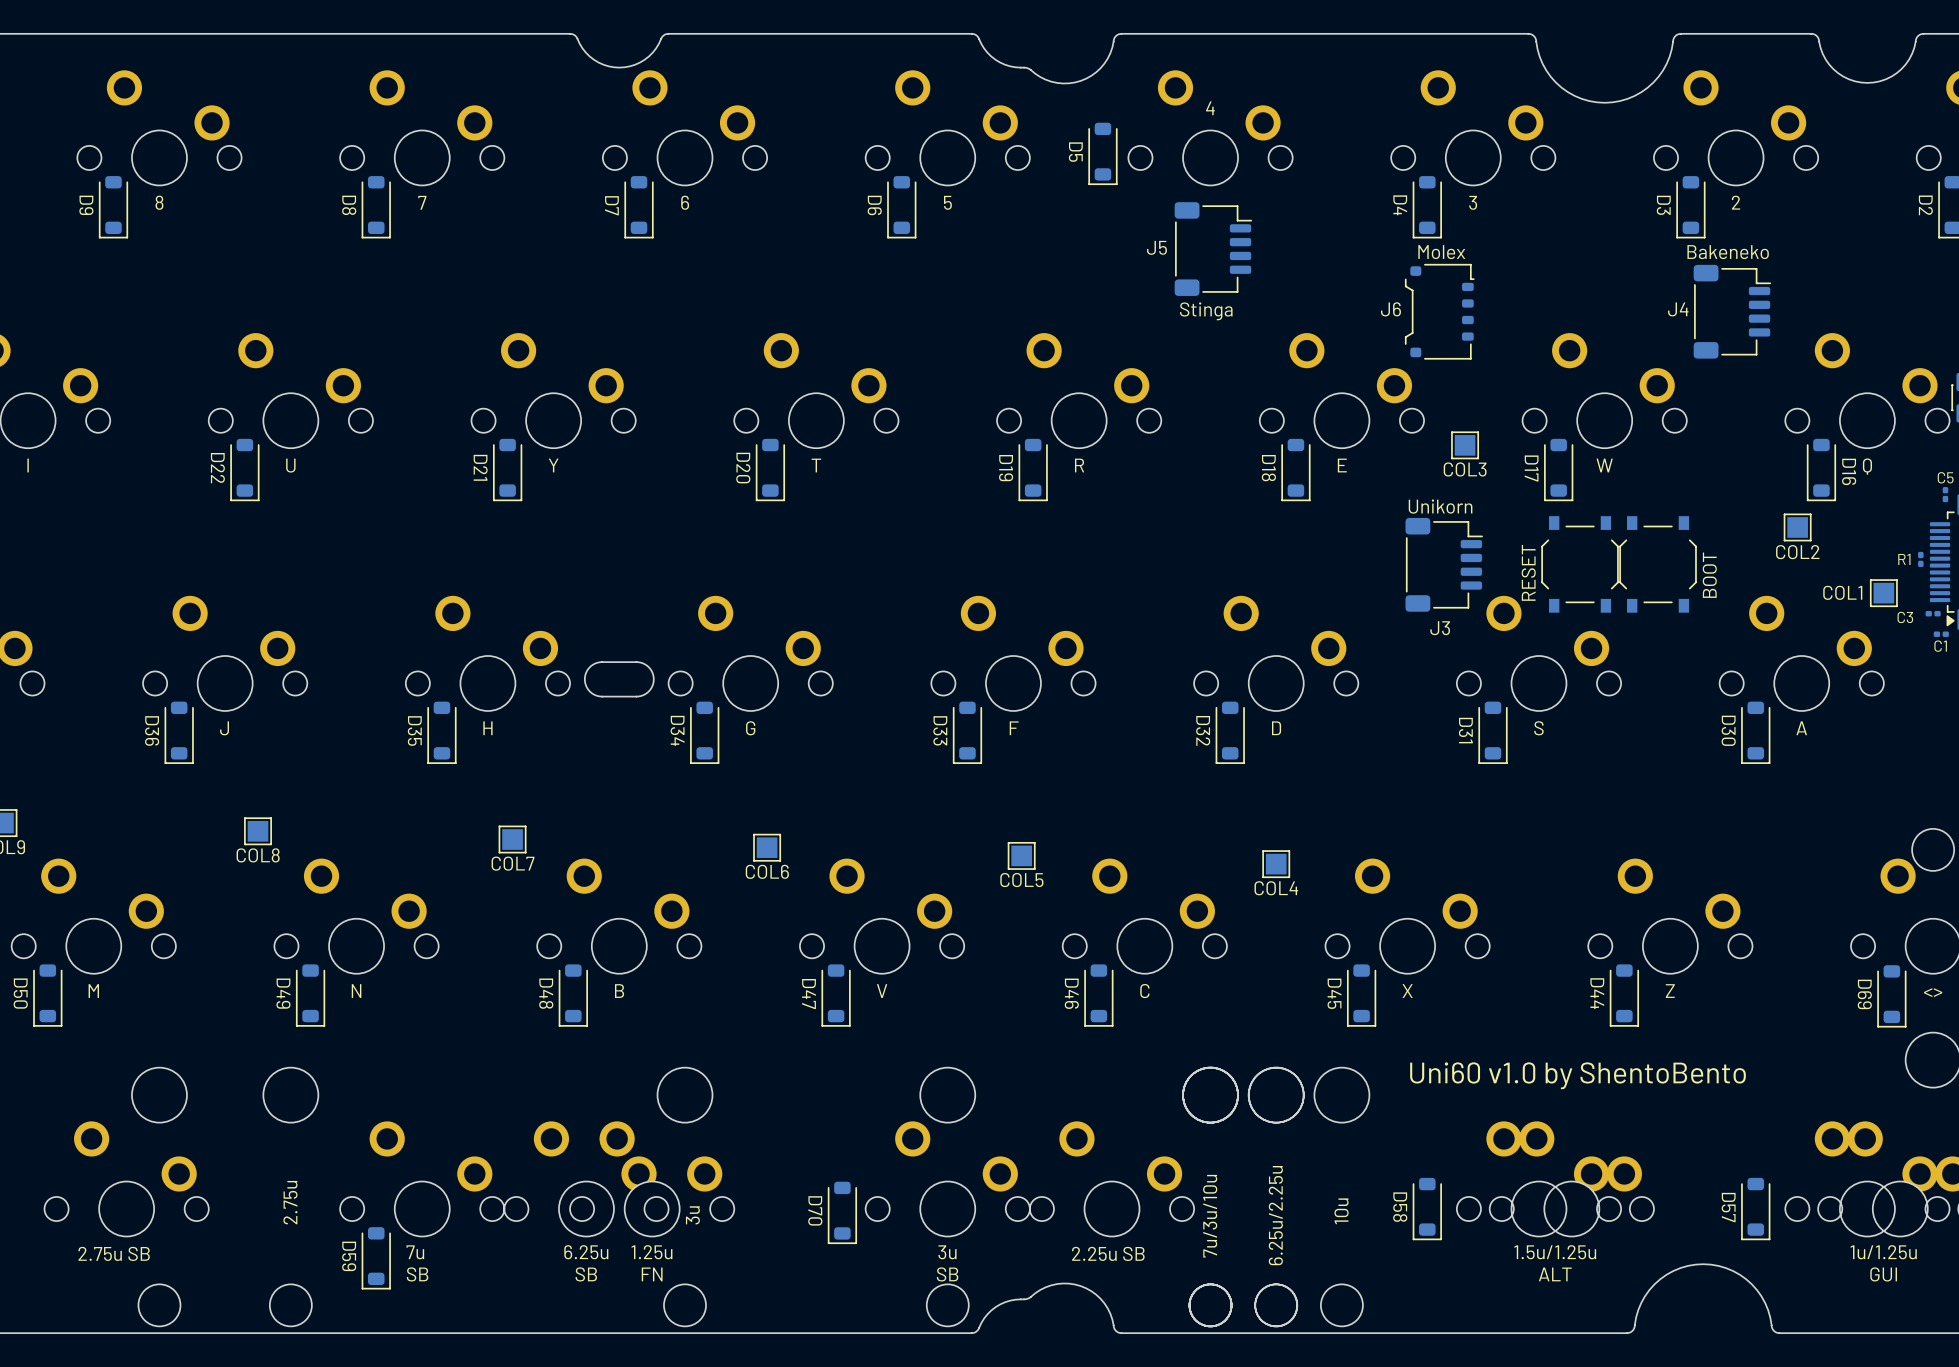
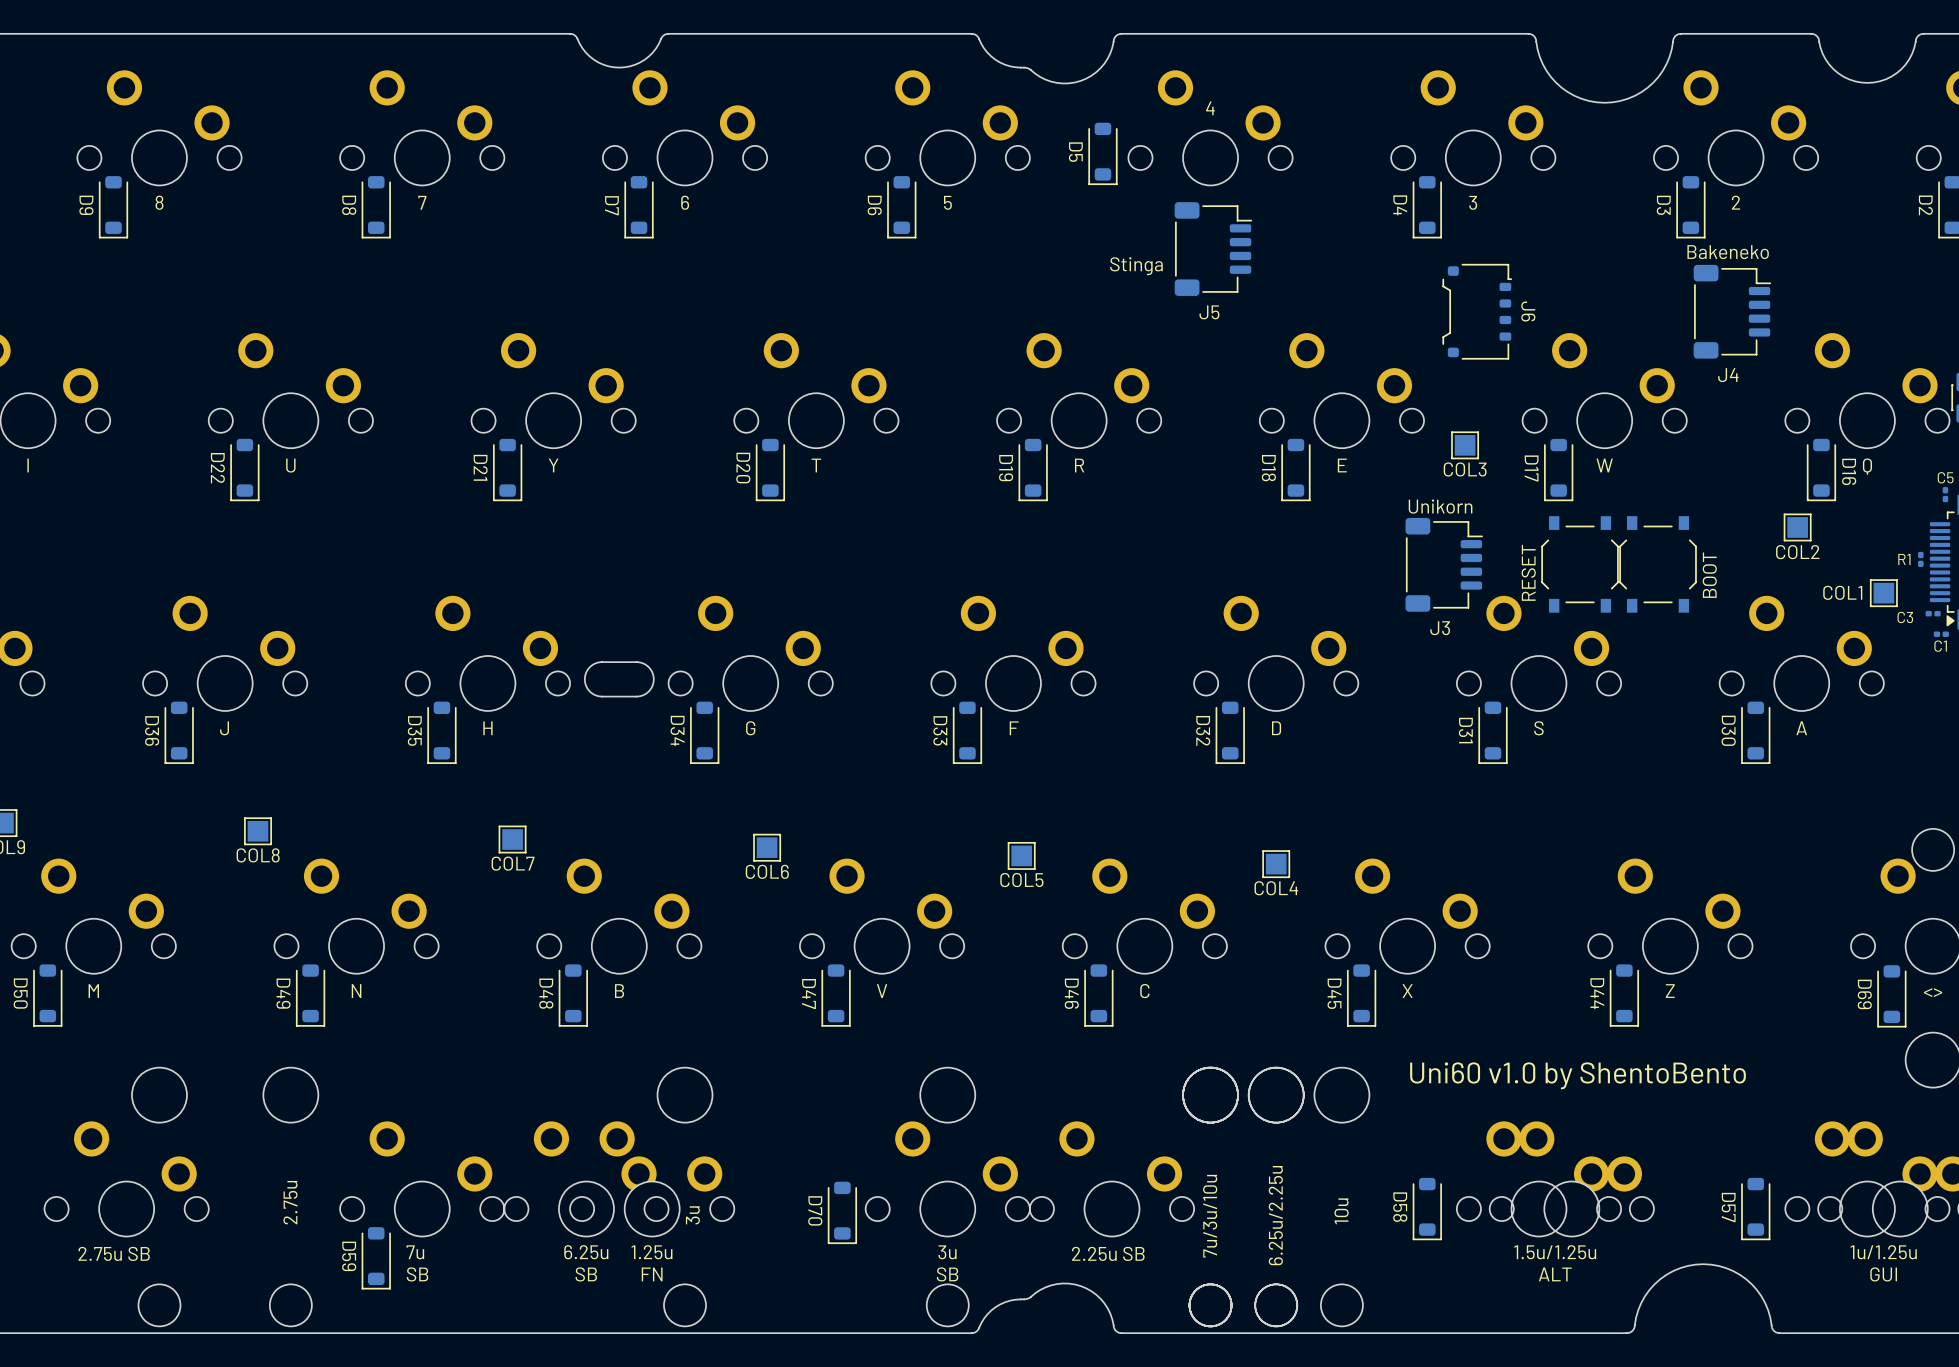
J5 name position: J5 (1156, 247) -> J5 (1209, 312)
text: Molex (1441, 252) -> none
J6 name rotation: 0° (1390, 309) -> 90° clockwise (1528, 311)
J6 name position: J6 (1390, 309) -> J6 (1528, 311)
J4 name position: J4 (1678, 309) -> J4 (1728, 375)
text position: Stinga (1206, 311) -> Stinga (1136, 266)
J6 position: (1439, 311) -> (1477, 311)

